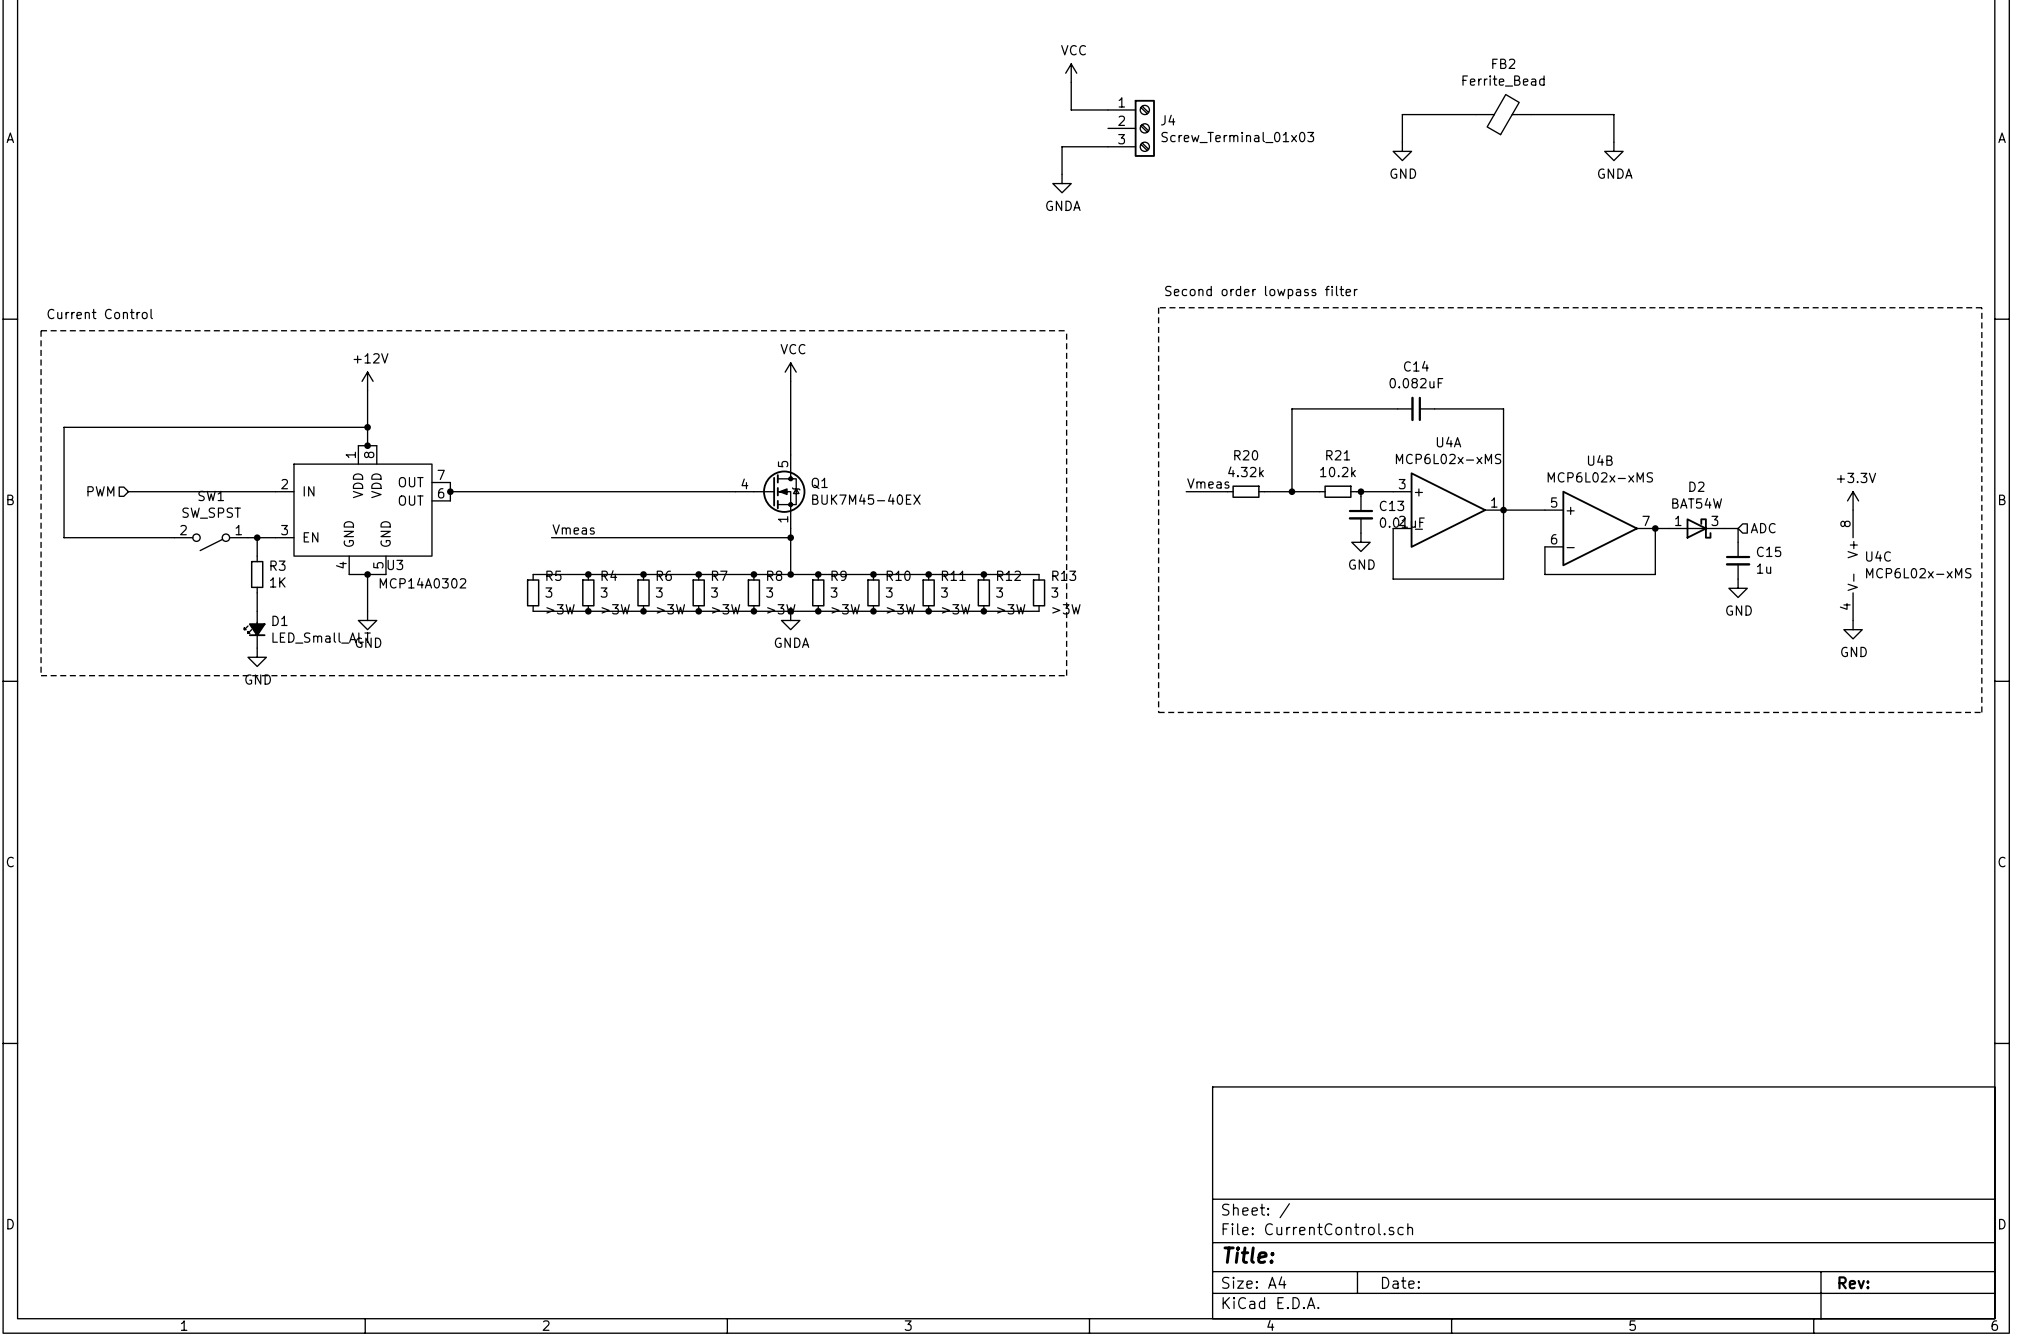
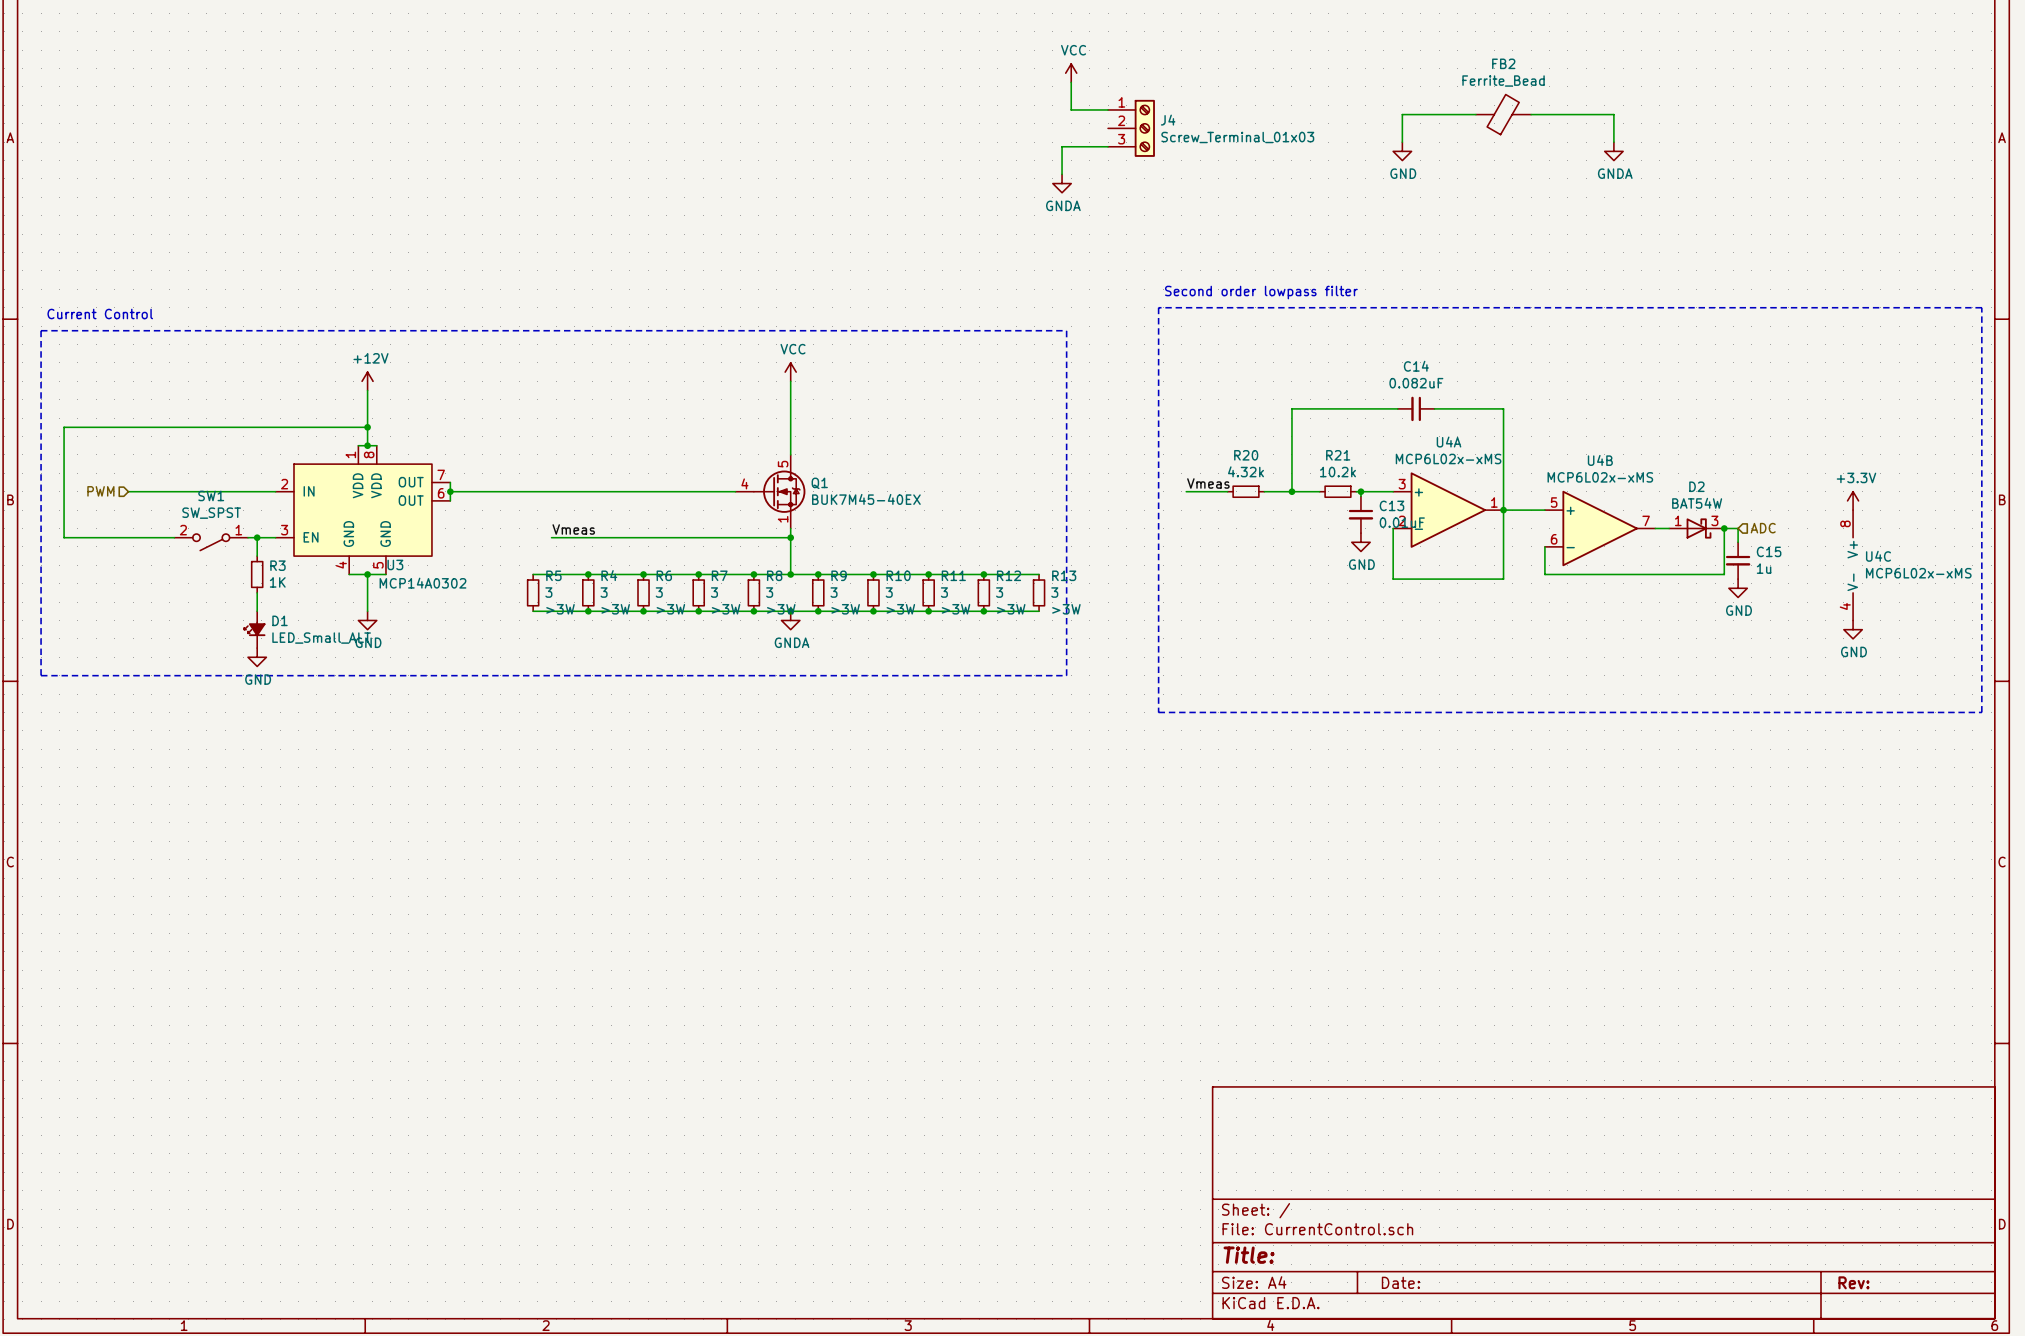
wire: (1655, 528) (1655, 574) -> (1724, 528) (1724, 574) (1655, 574)
junction: (1655, 528) -> none
junction: none -> (1724, 528)

